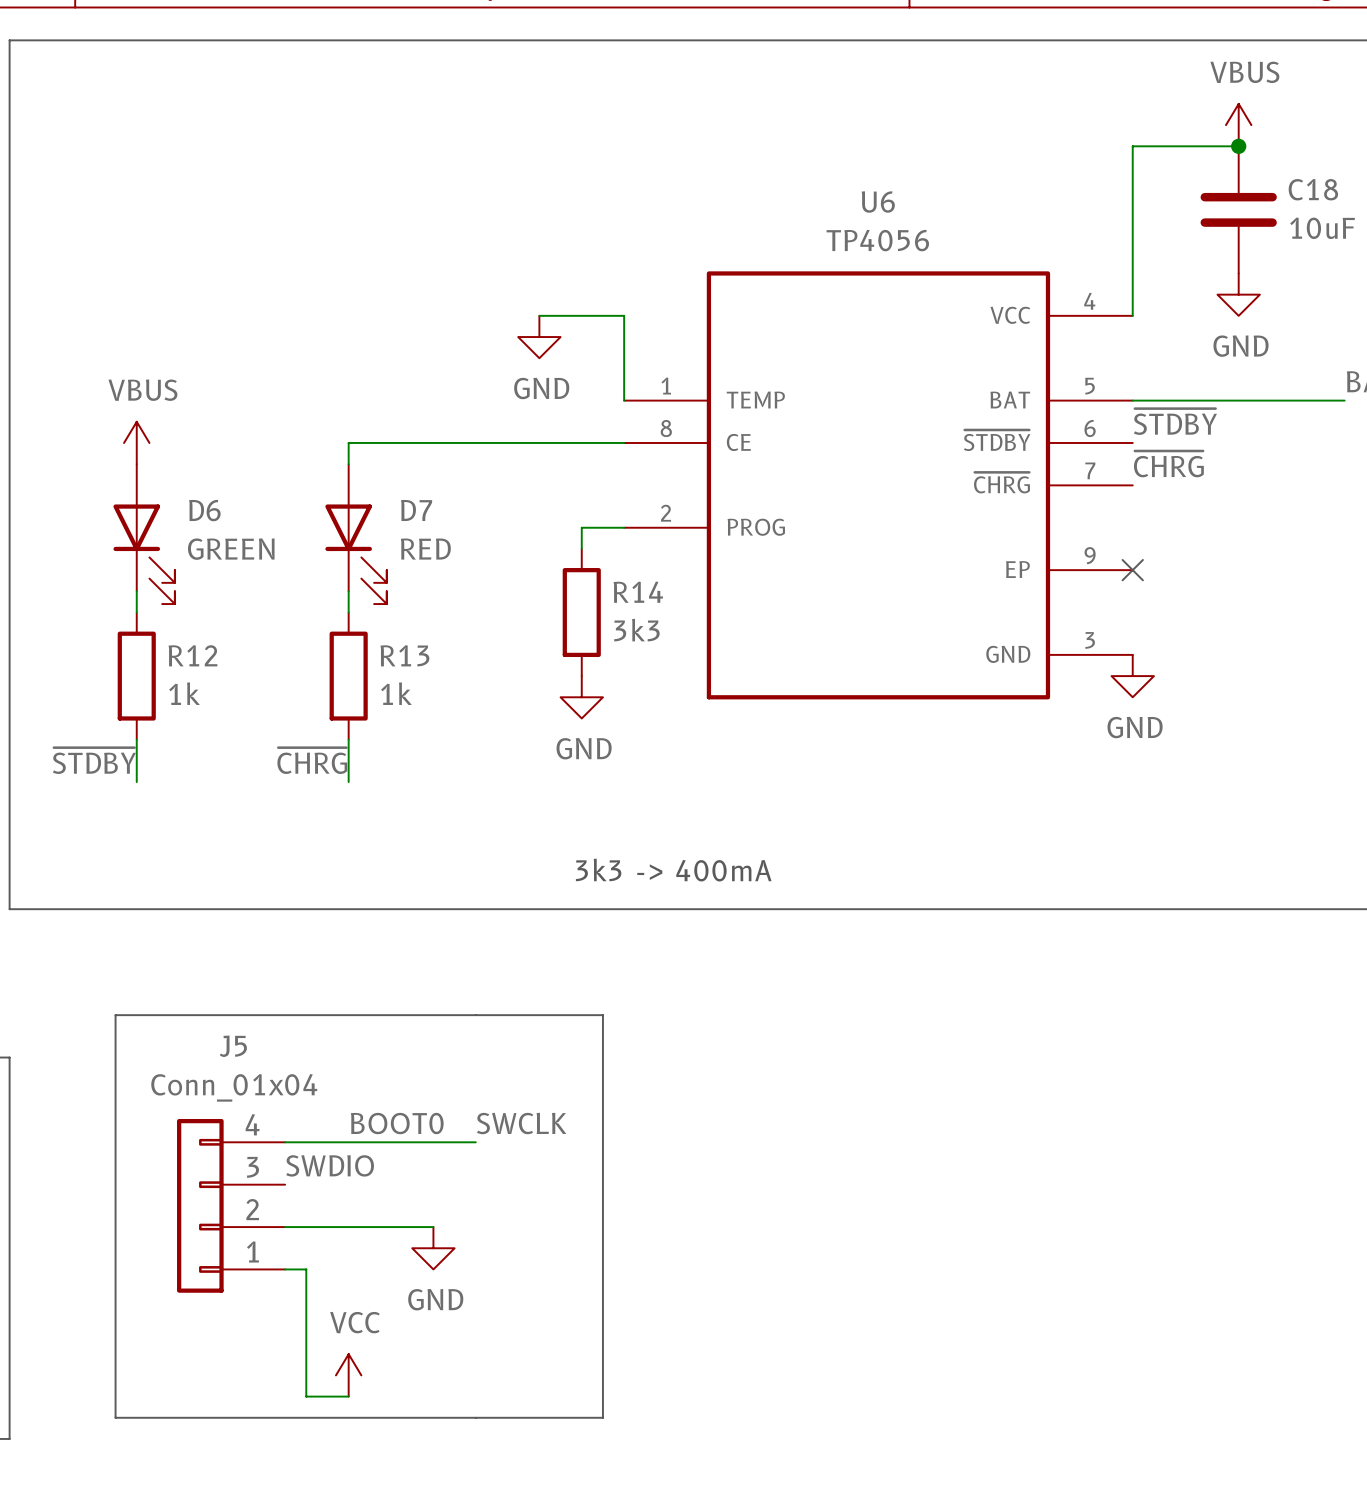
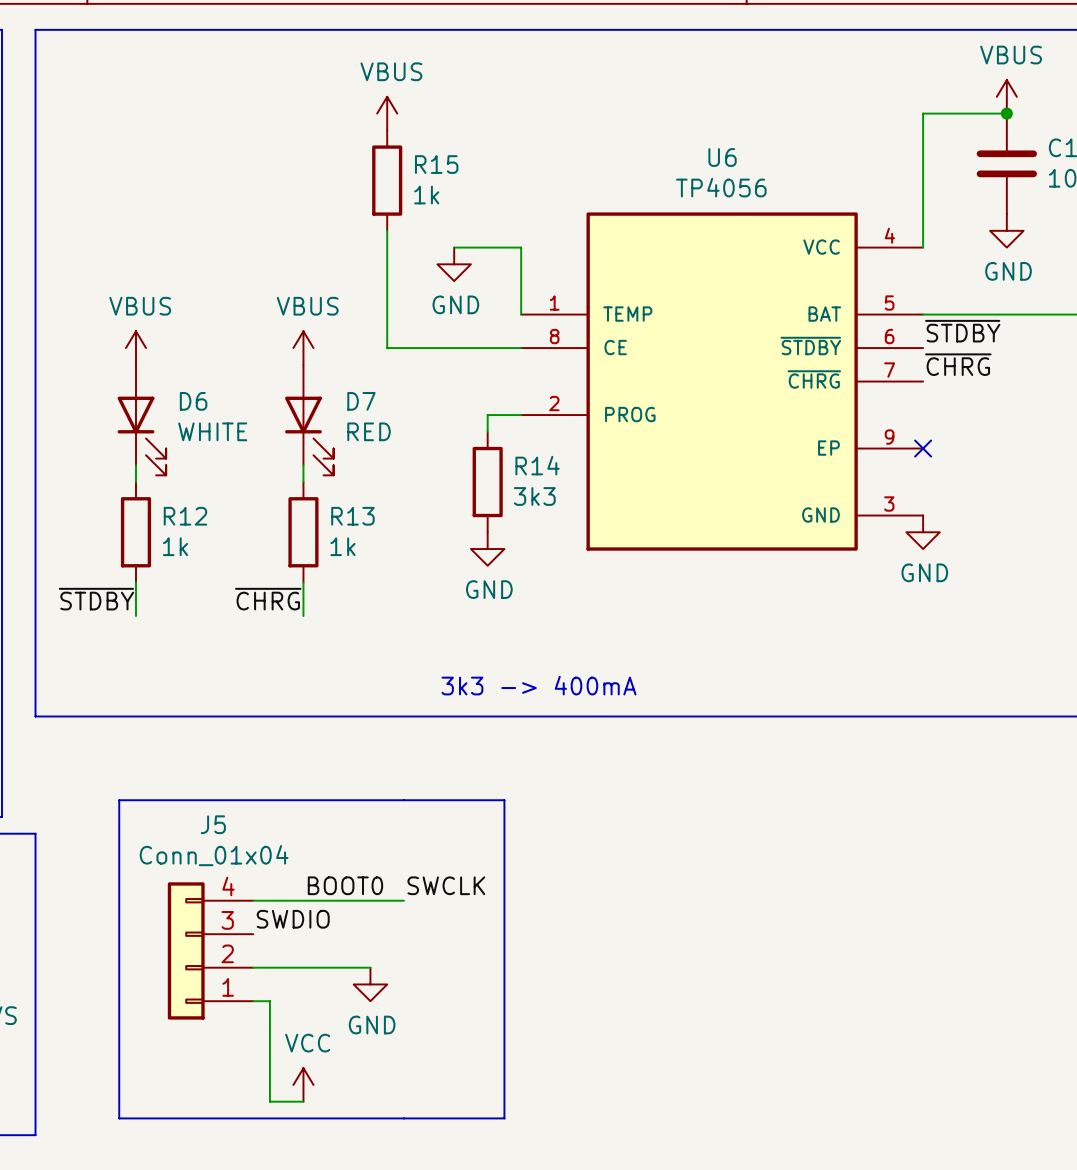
power symbol: none -> VBUS (387, 113)
R15: none -> 1k (387, 180)
power symbol: none -> VBUS (303, 348)
wire: (454, 442) (348, 442) (348, 464) -> (387, 348) (387, 230)
D6 value: GREEN (231, 549) -> WHITE (212, 431)

